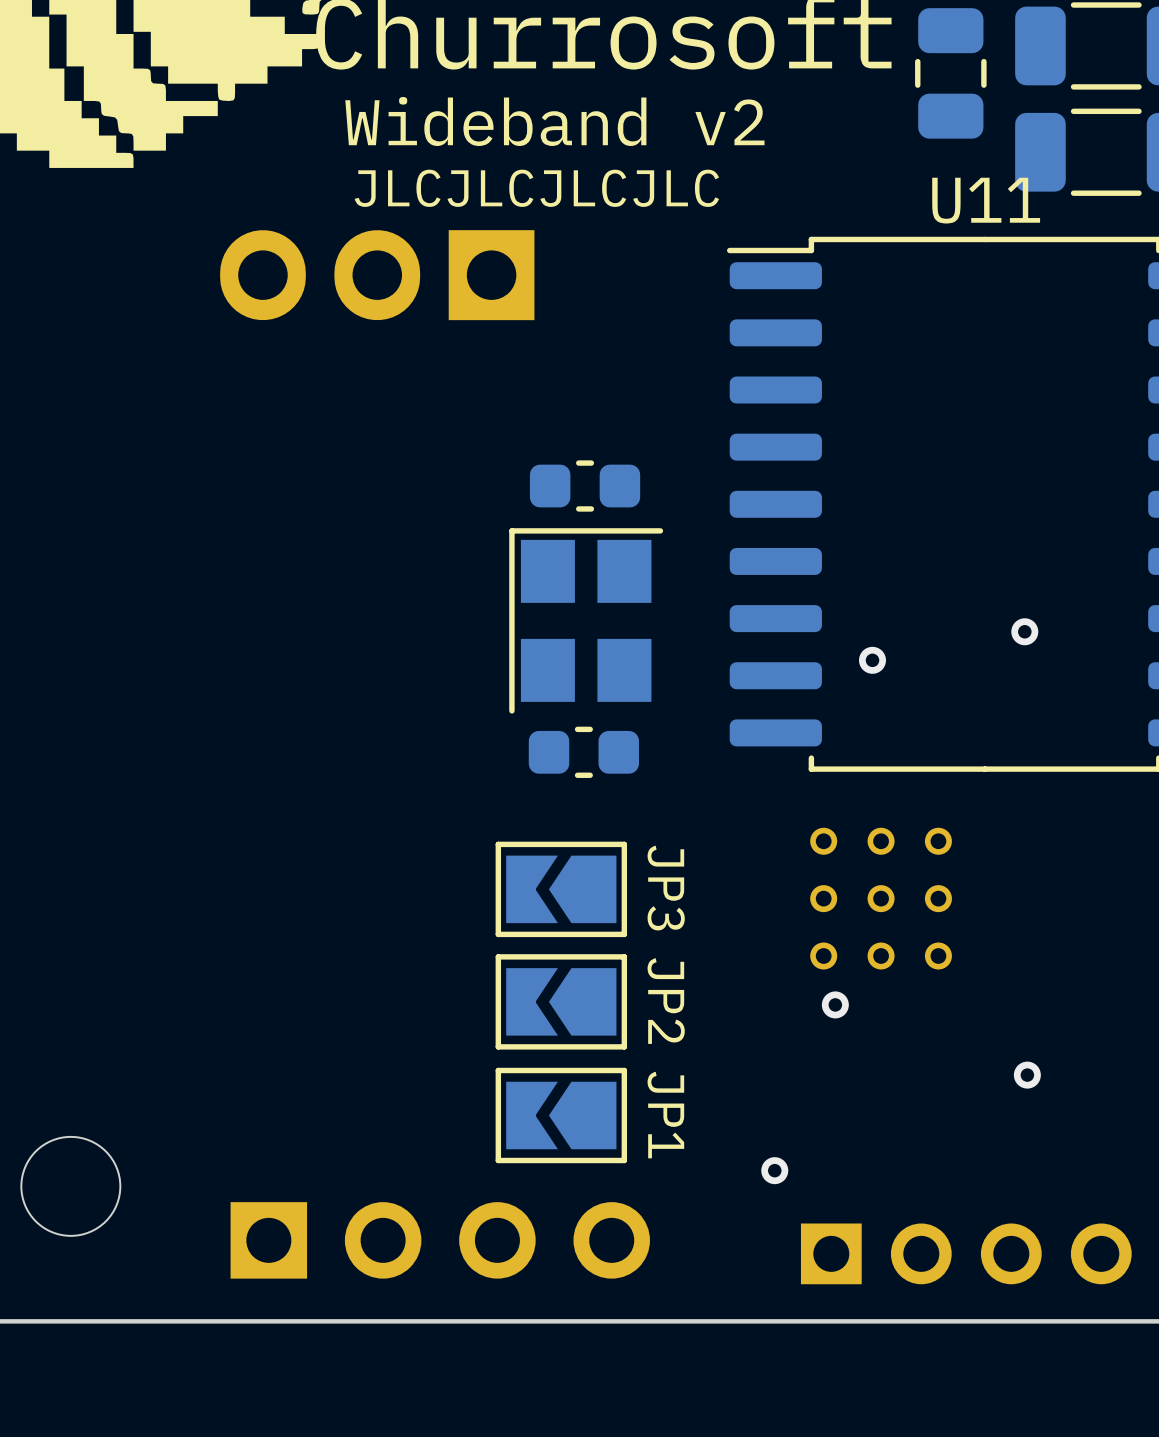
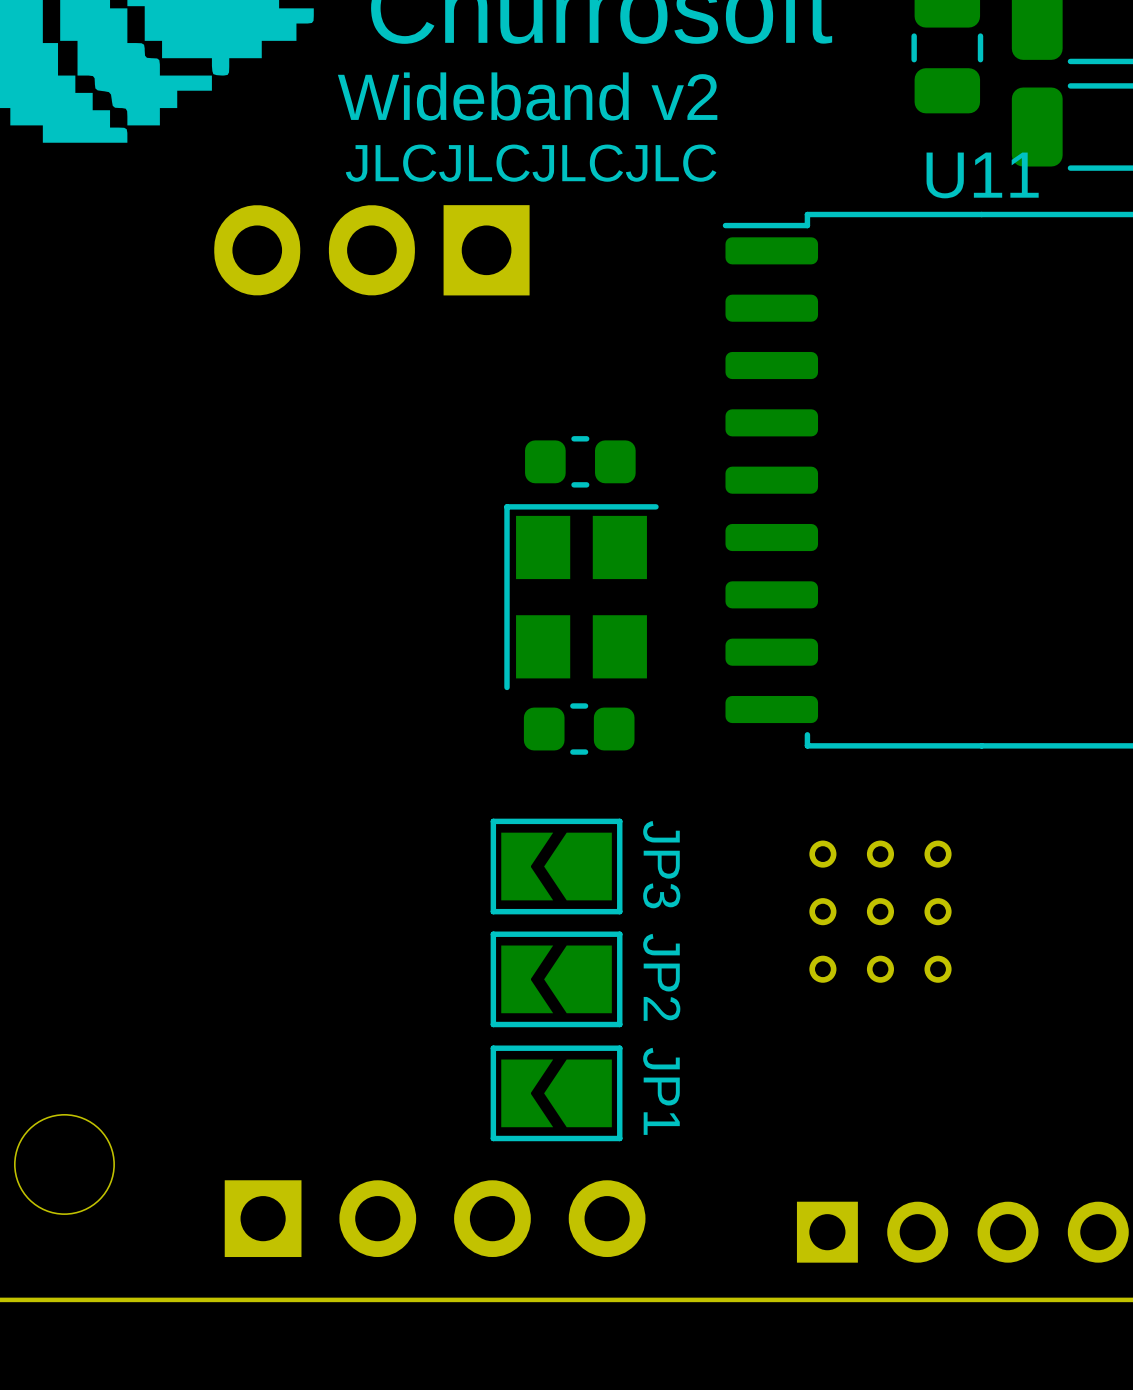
via: (1024, 631) -> none
via: (872, 660) -> none
part position: (881, 898) -> (880, 911)
via: (835, 1004) -> none
via: (1027, 1075) -> none
via: (774, 1170) -> none

